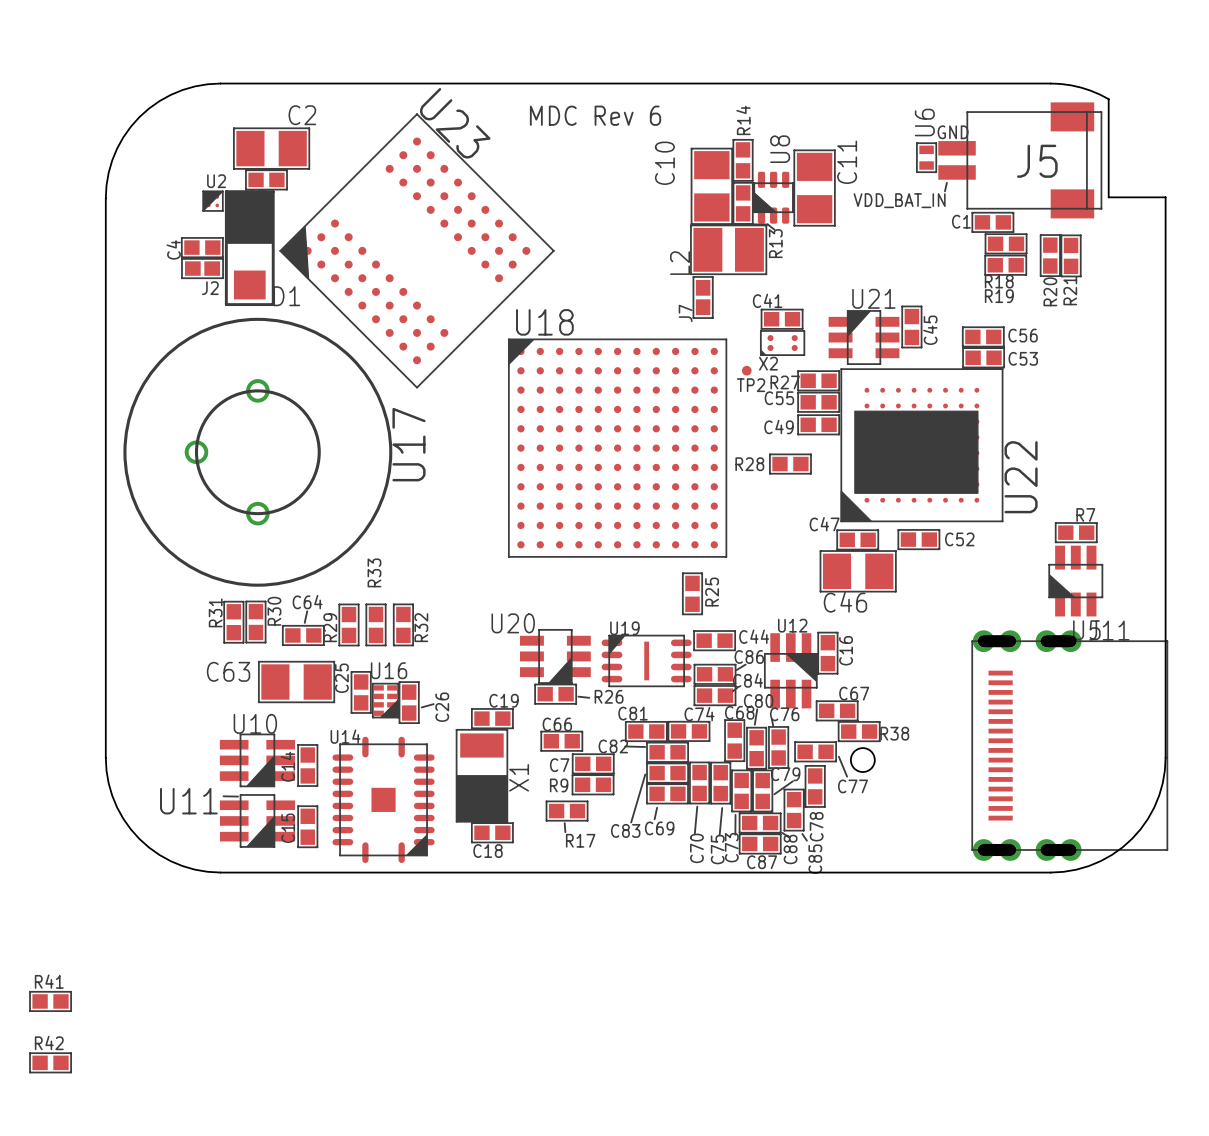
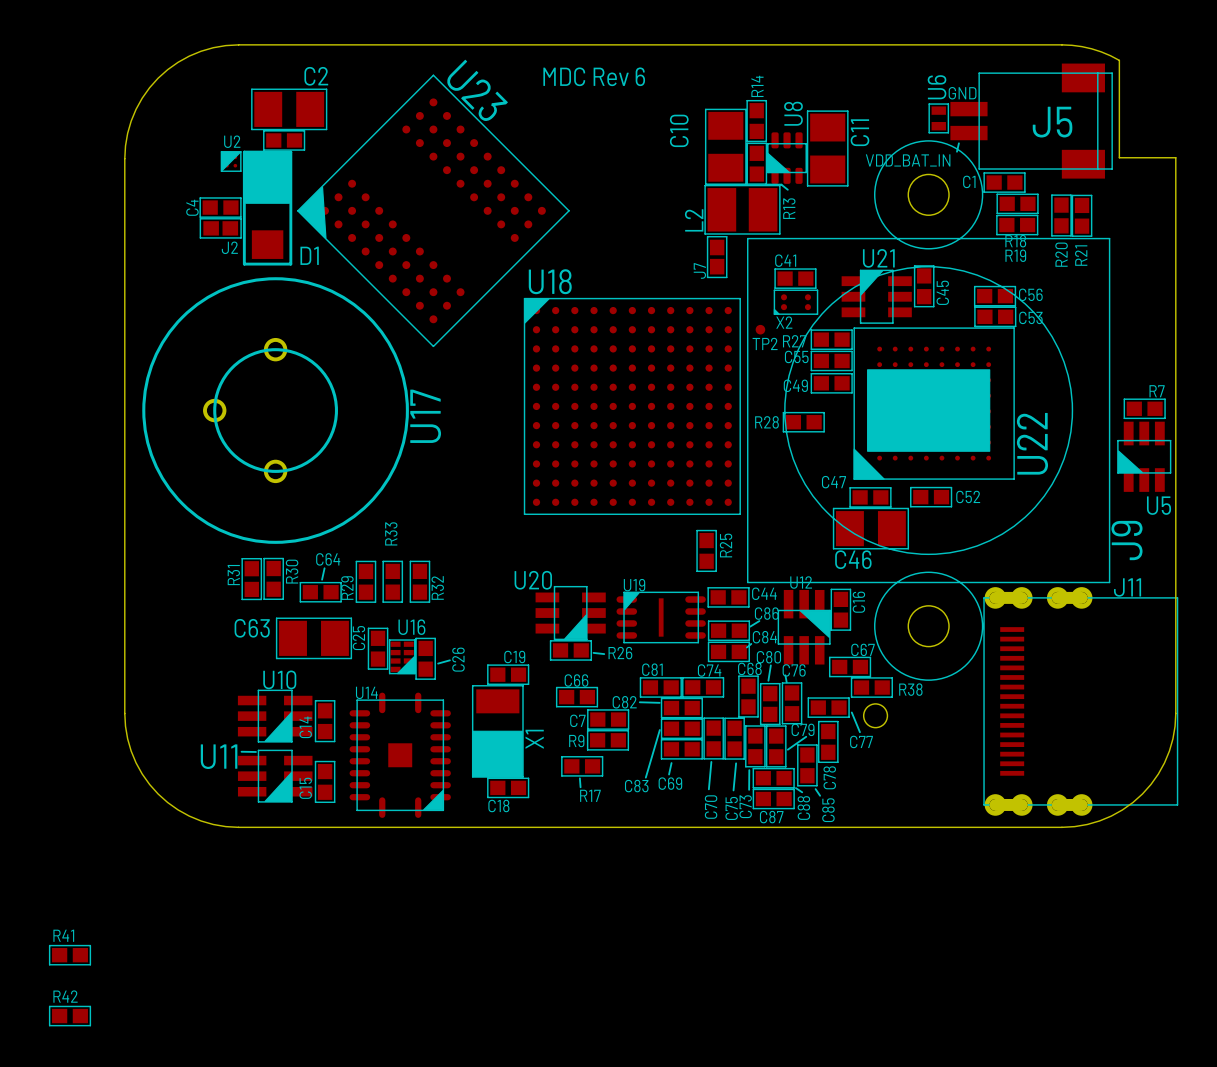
J9: none -> (928, 410)
R7 position: (1076, 532) -> (1144, 408)
U5 position: (1075, 581) -> (1144, 456)

